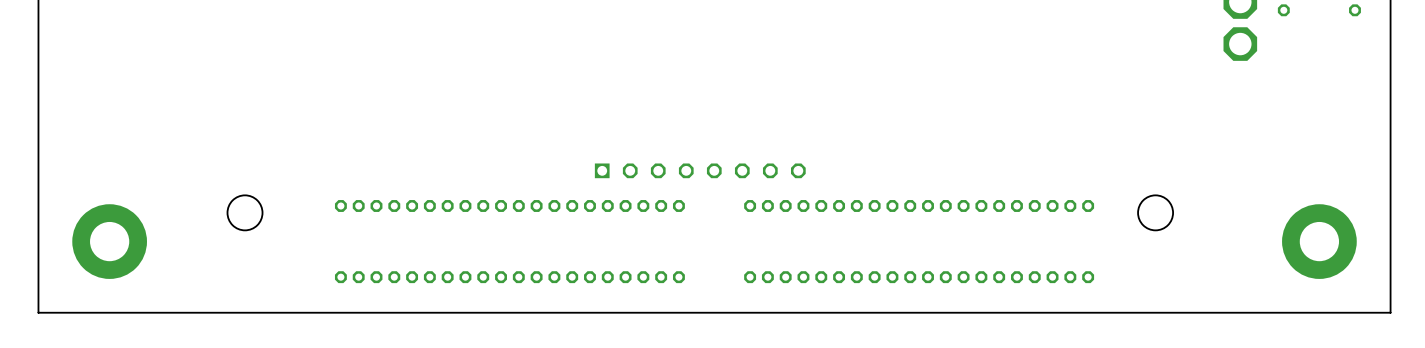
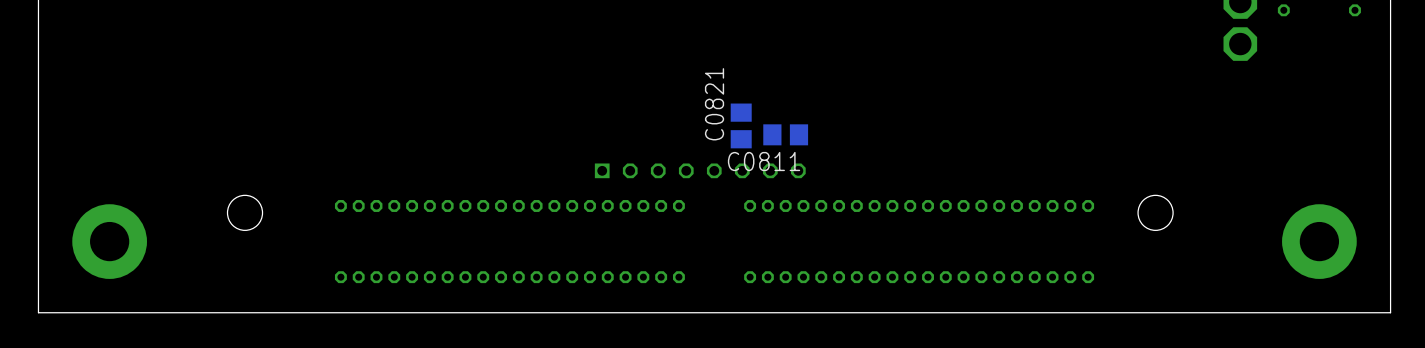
C0821: none -> (741, 125)
C0811: none -> (785, 134)

